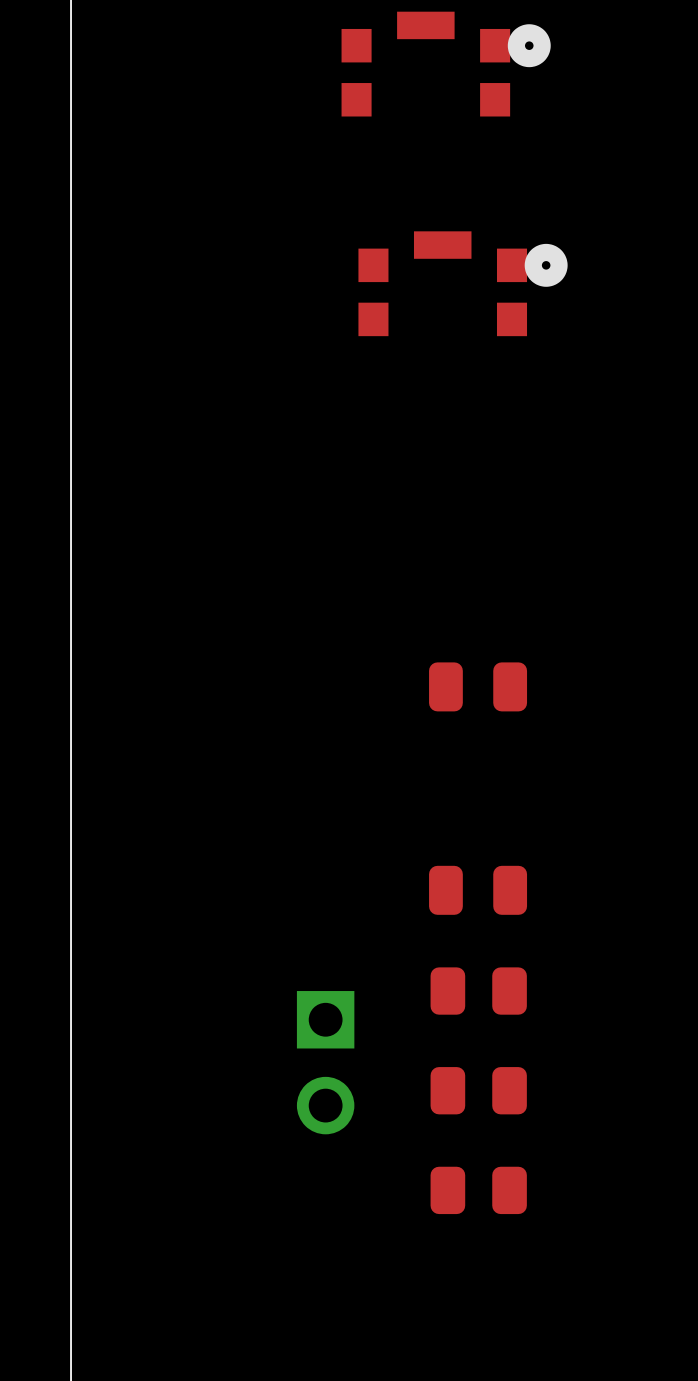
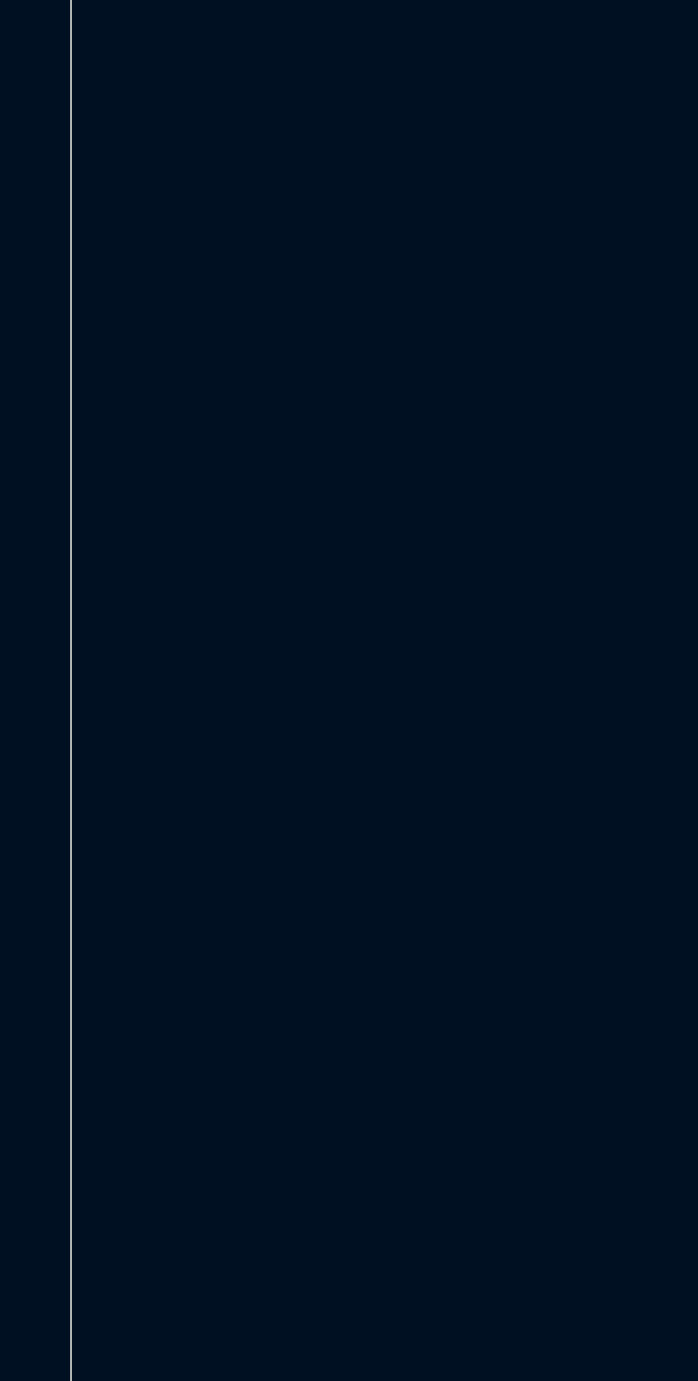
part: (446, 64) -> none
part: (463, 283) -> none
part: (478, 686) -> none
part: (478, 890) -> none
part: (478, 991) -> none
part: (325, 1062) -> none
part: (478, 1090) -> none
part: (478, 1190) -> none

